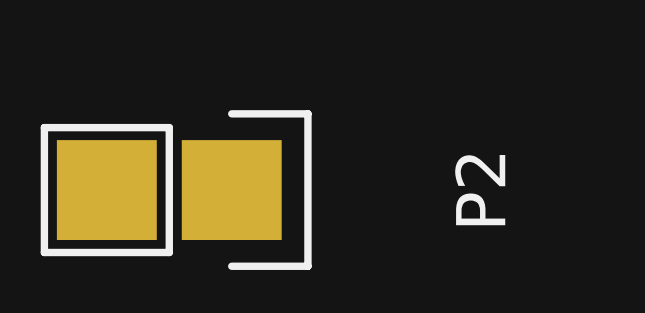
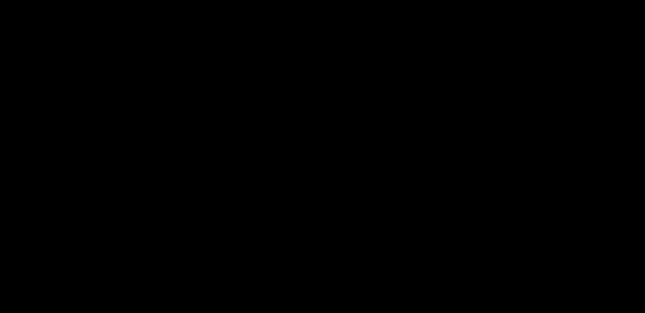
P2: (176, 190) -> none

